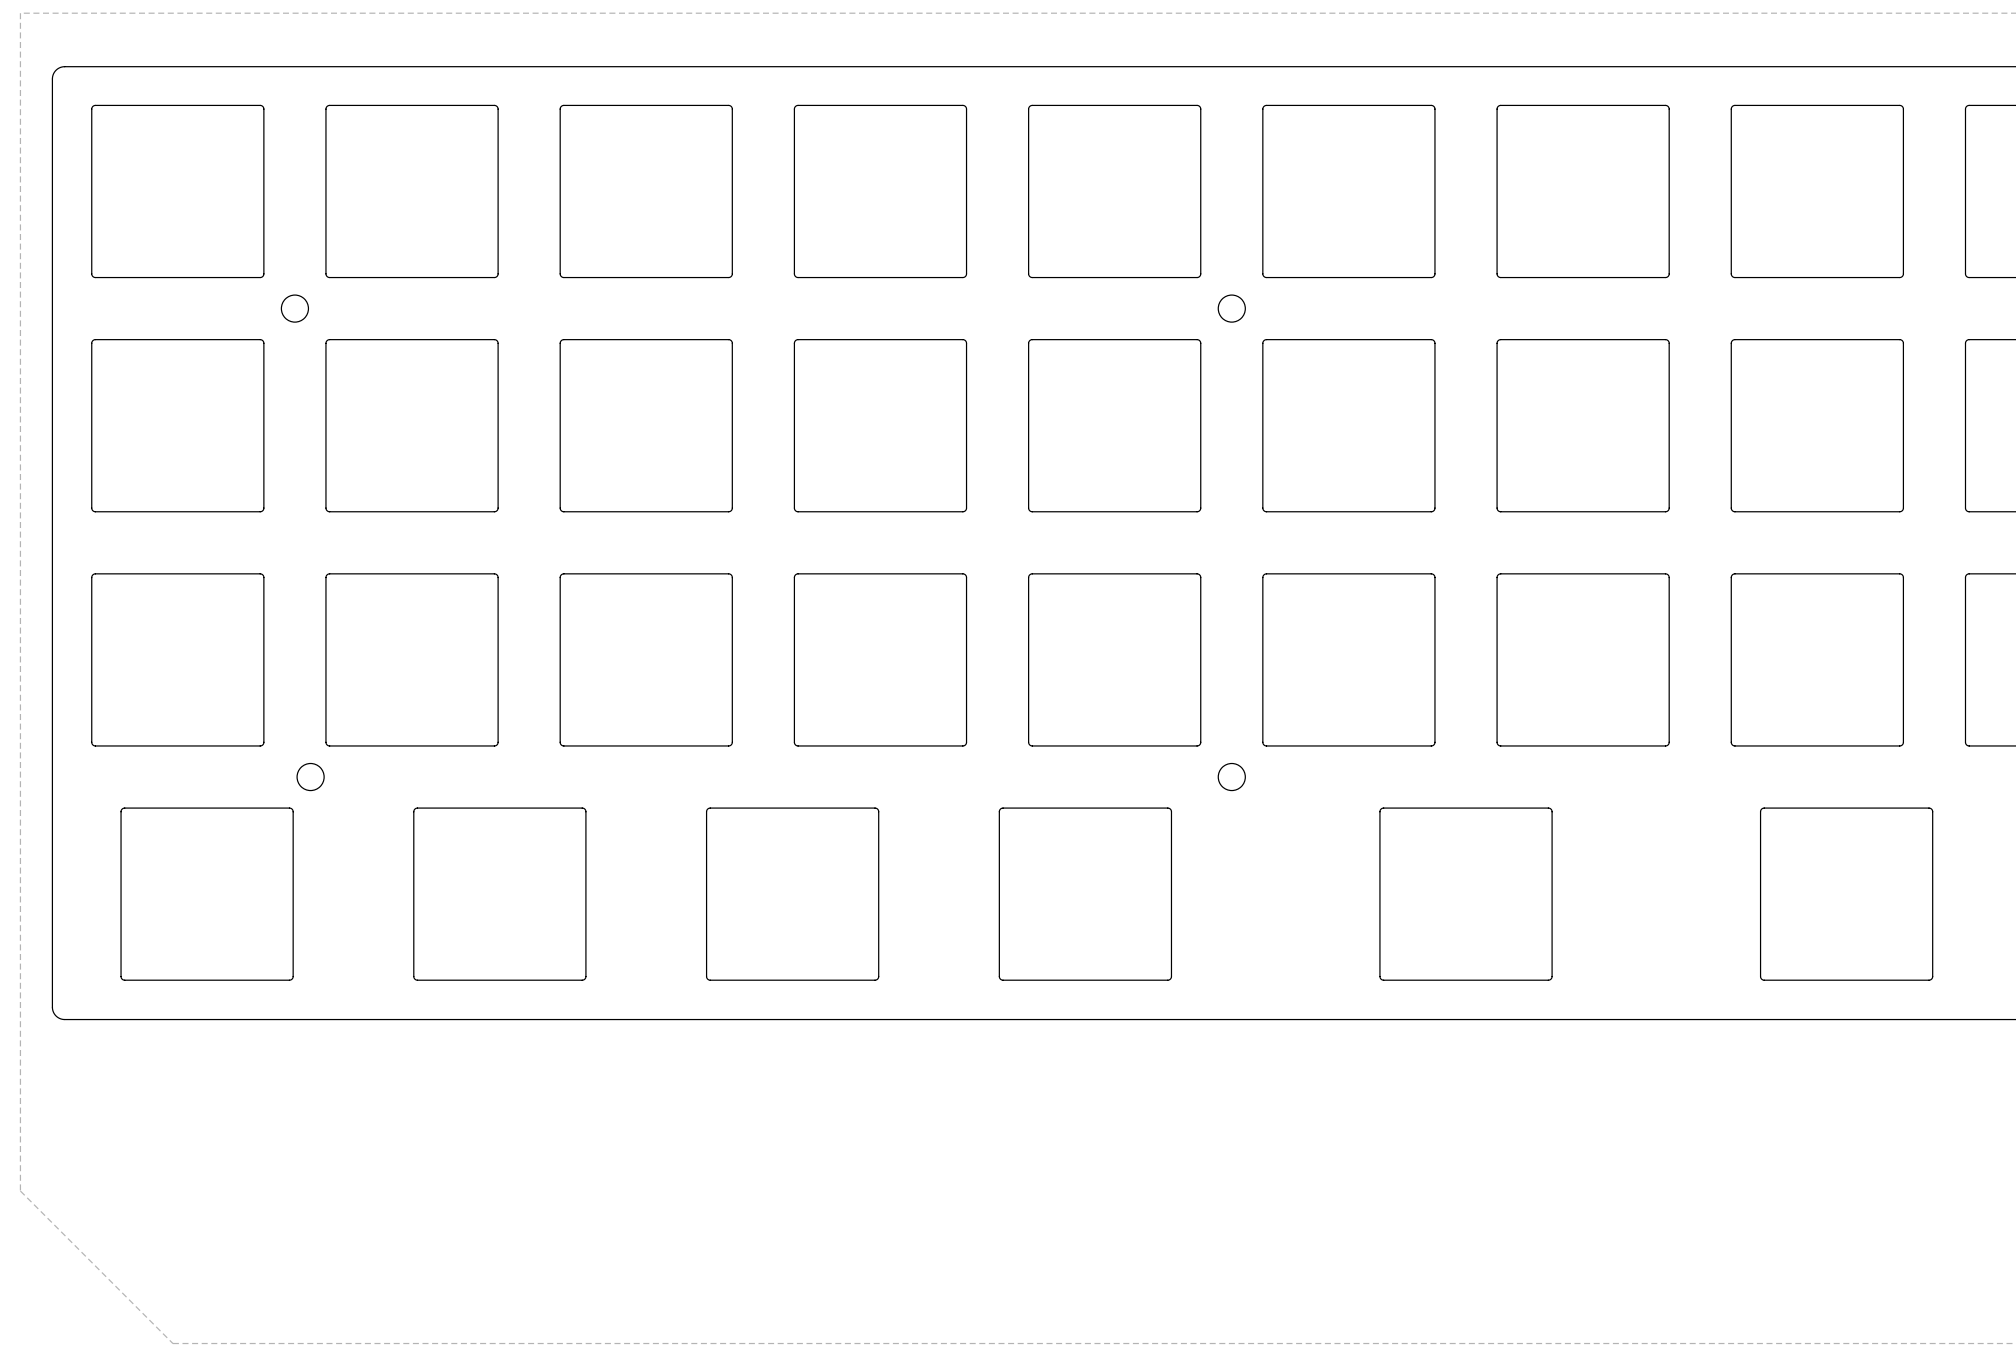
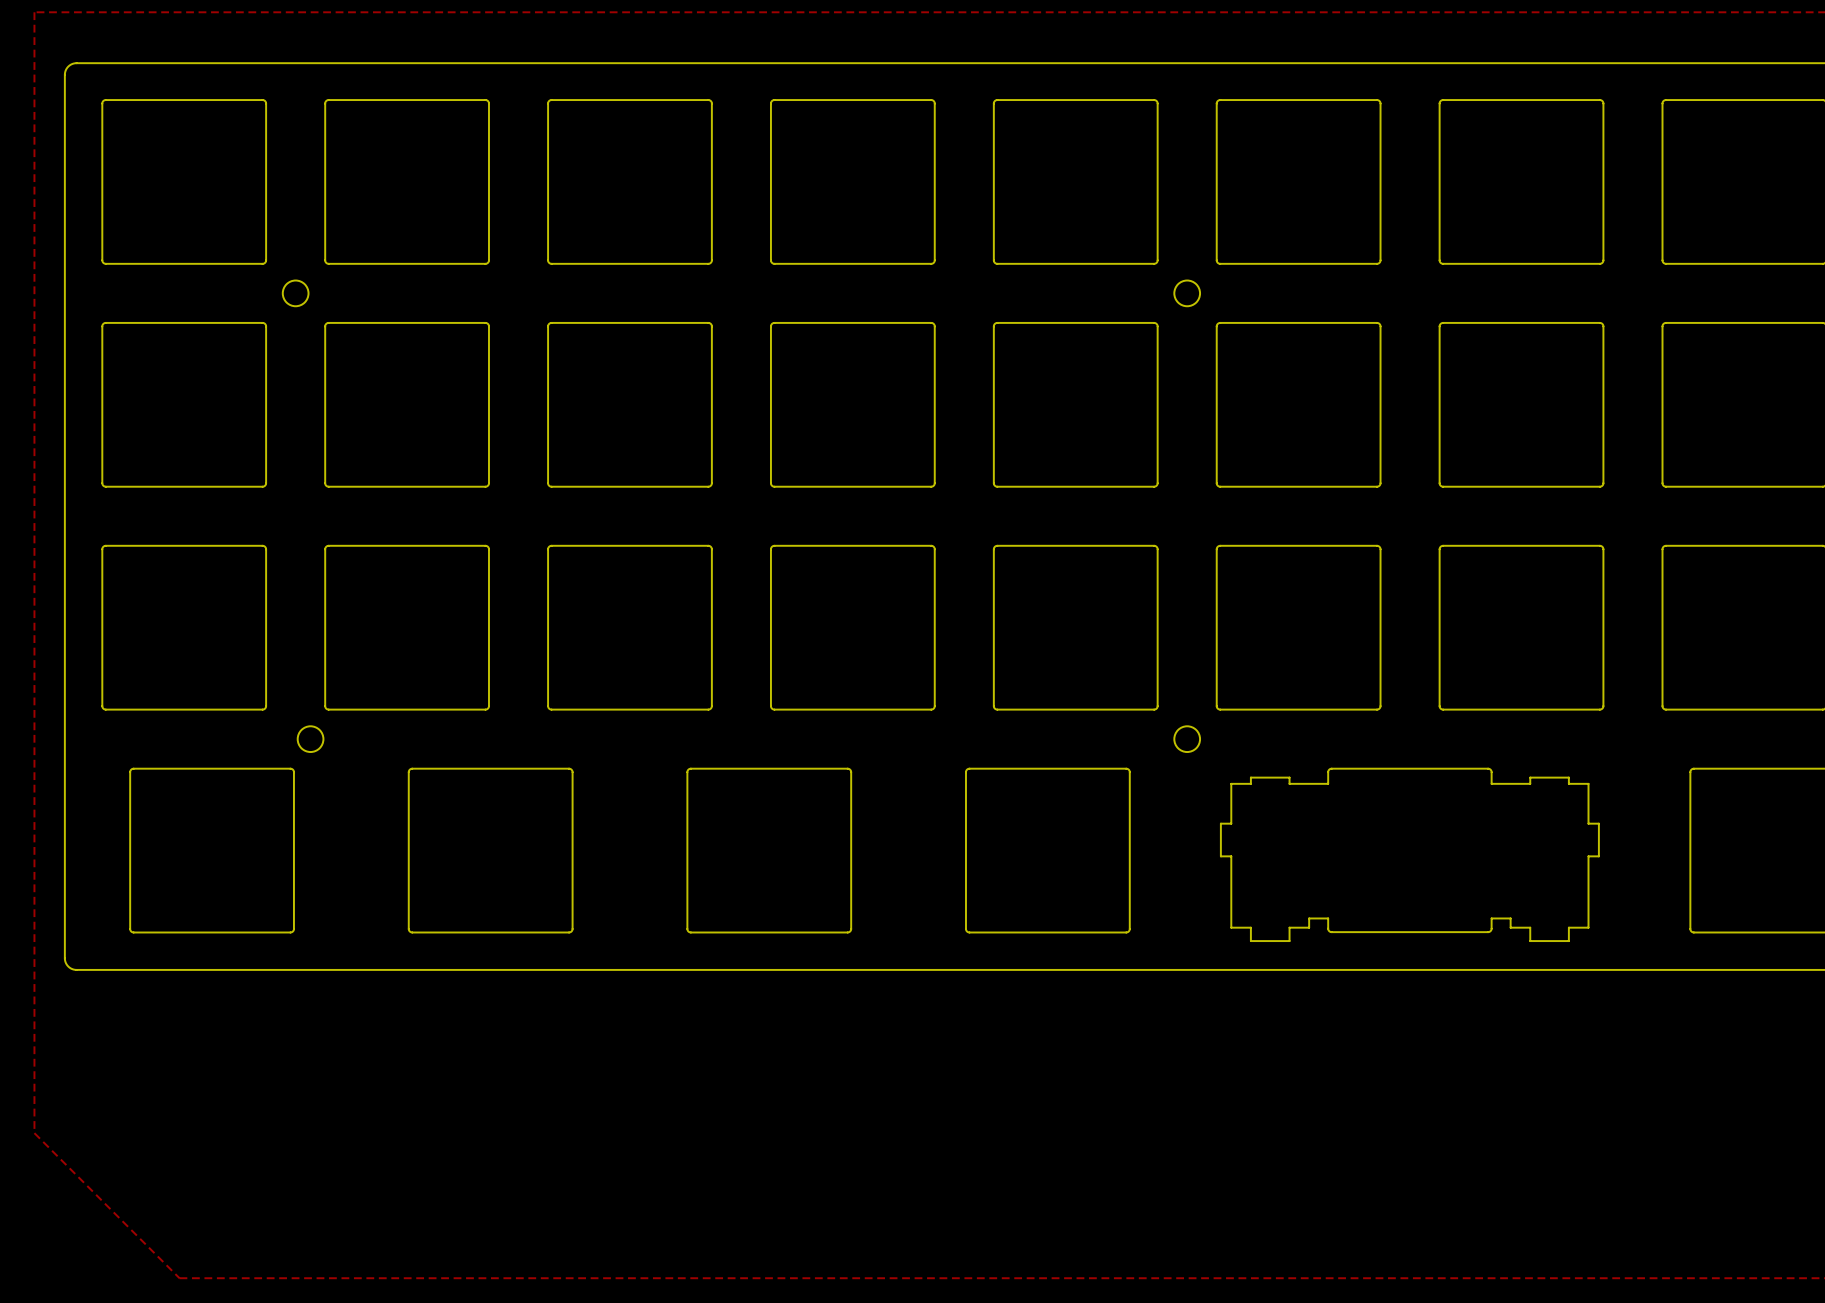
drawing shape: [1379, 807, 1553, 981] -> [1220, 768, 1600, 942]

